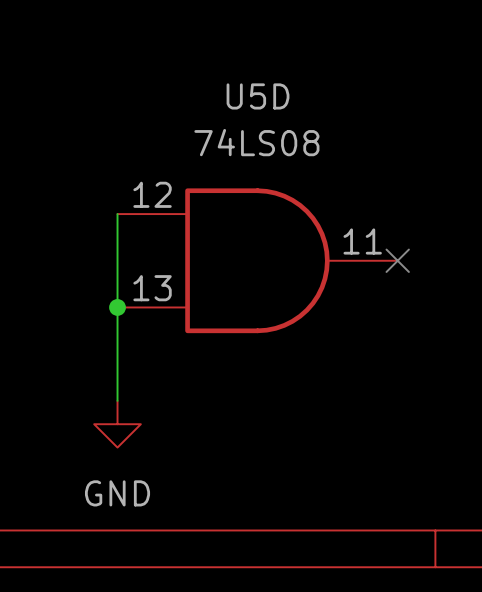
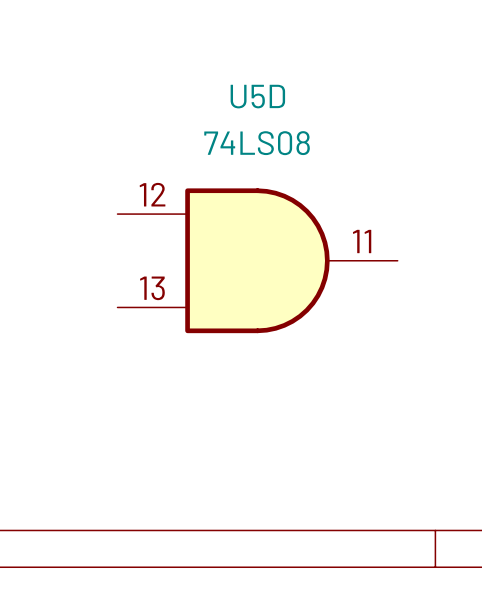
wire: (117, 214) (117, 400) -> none
no-connect mark: (397, 260) -> none
junction: (117, 307) -> none
power symbol: GND (117, 424) -> none

